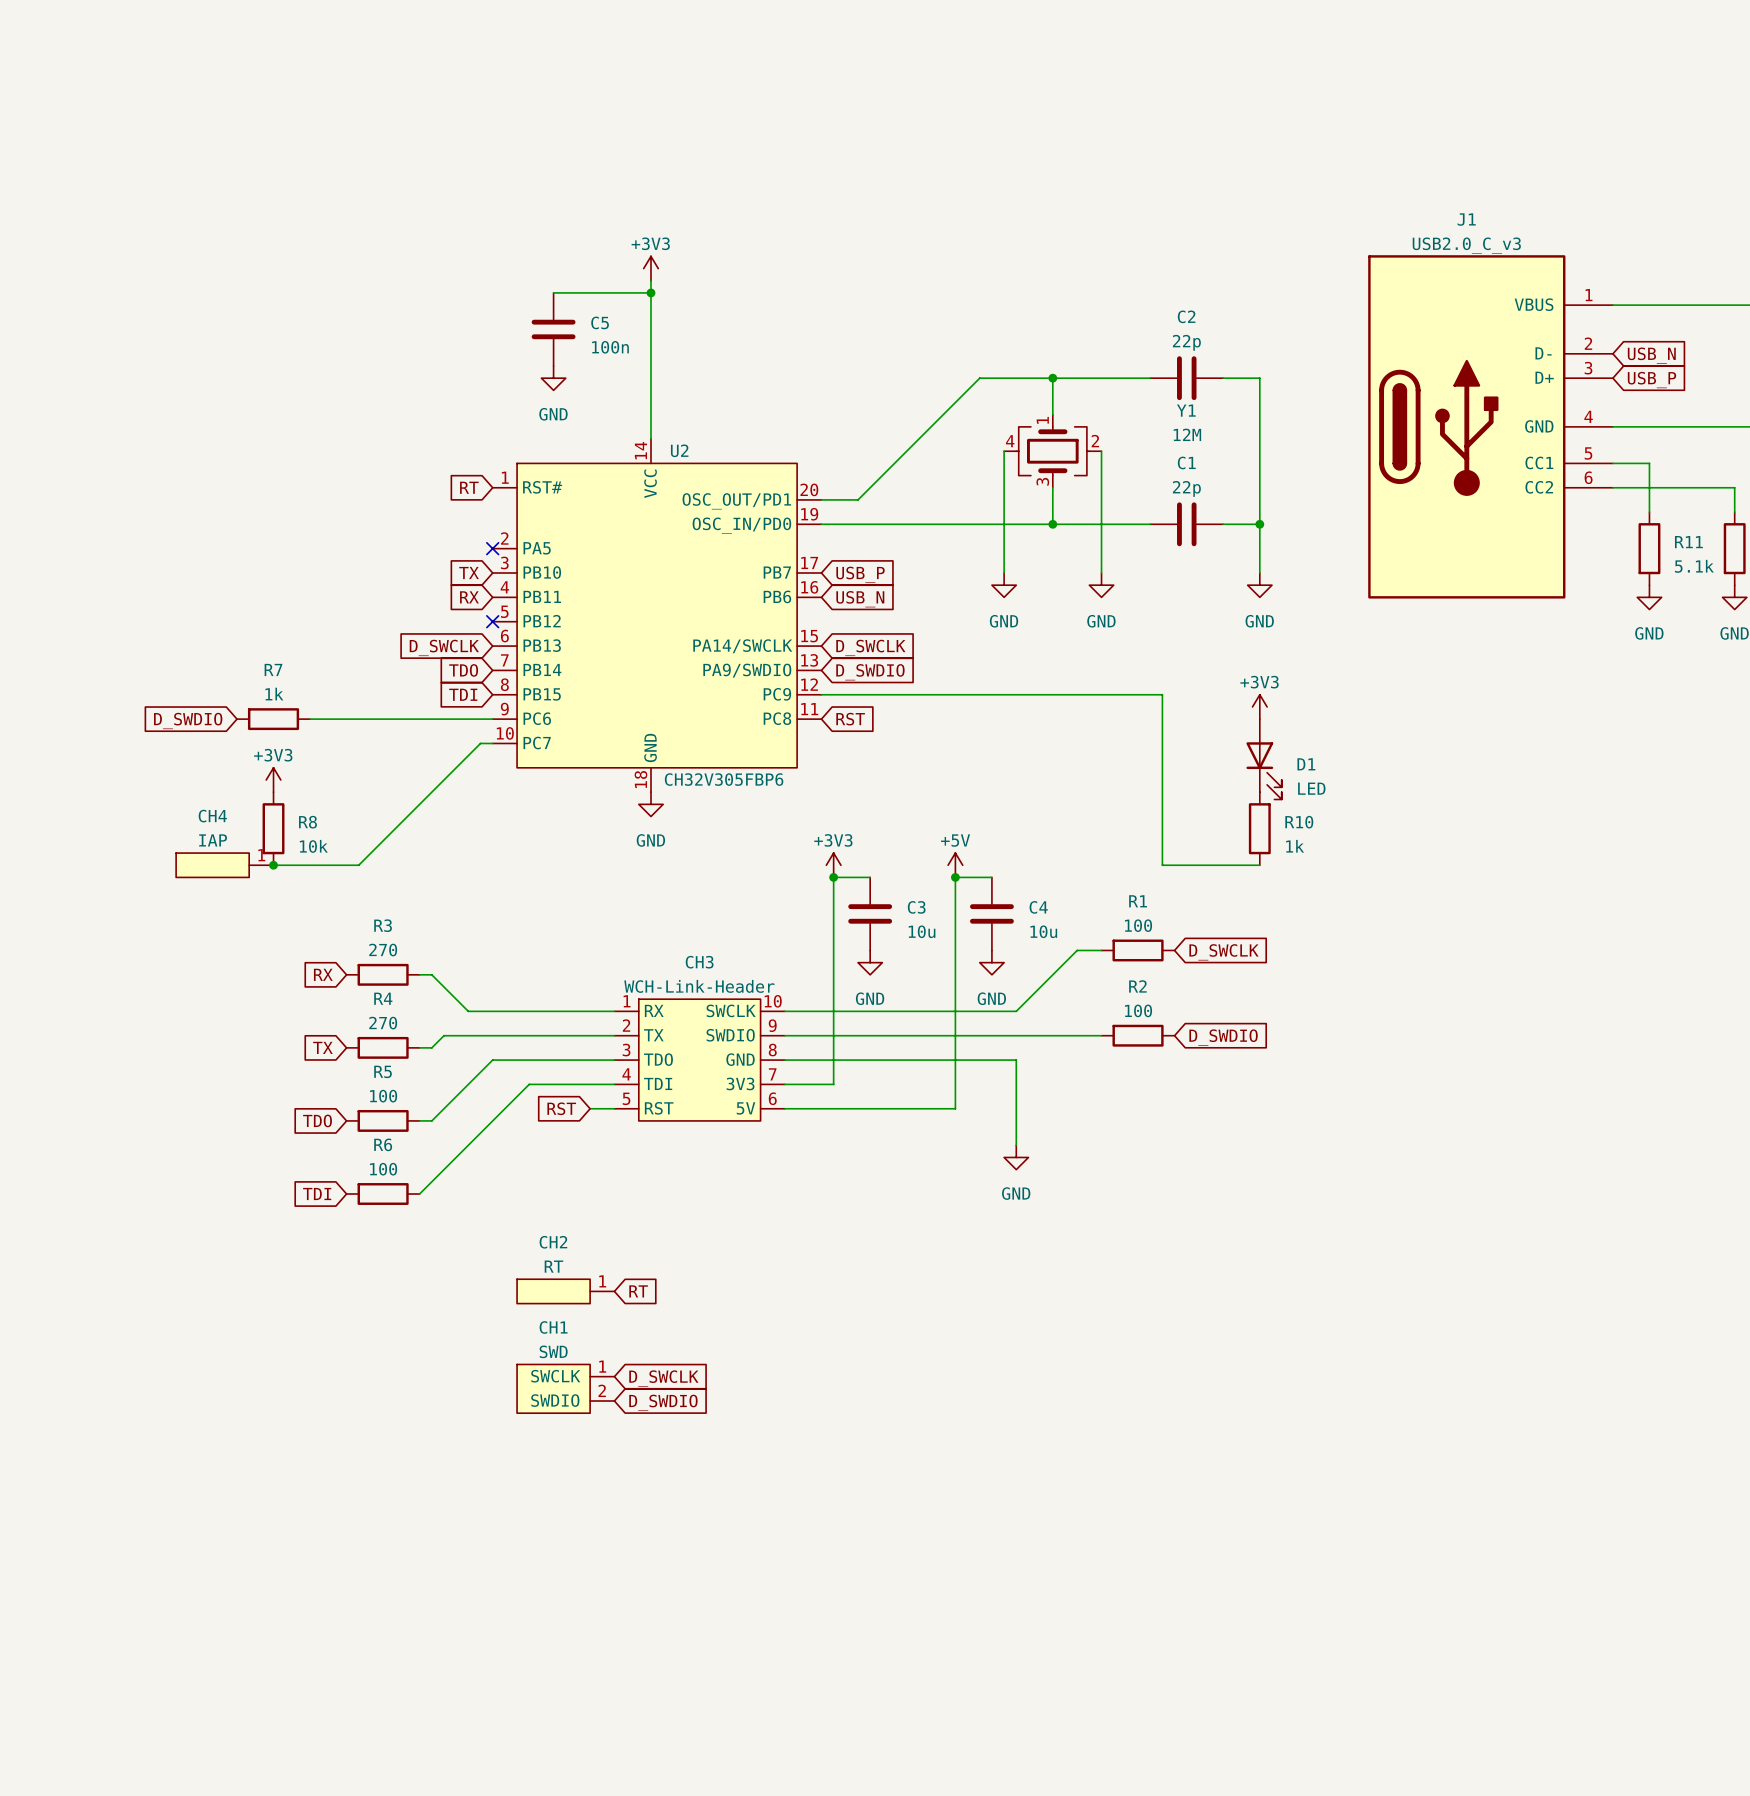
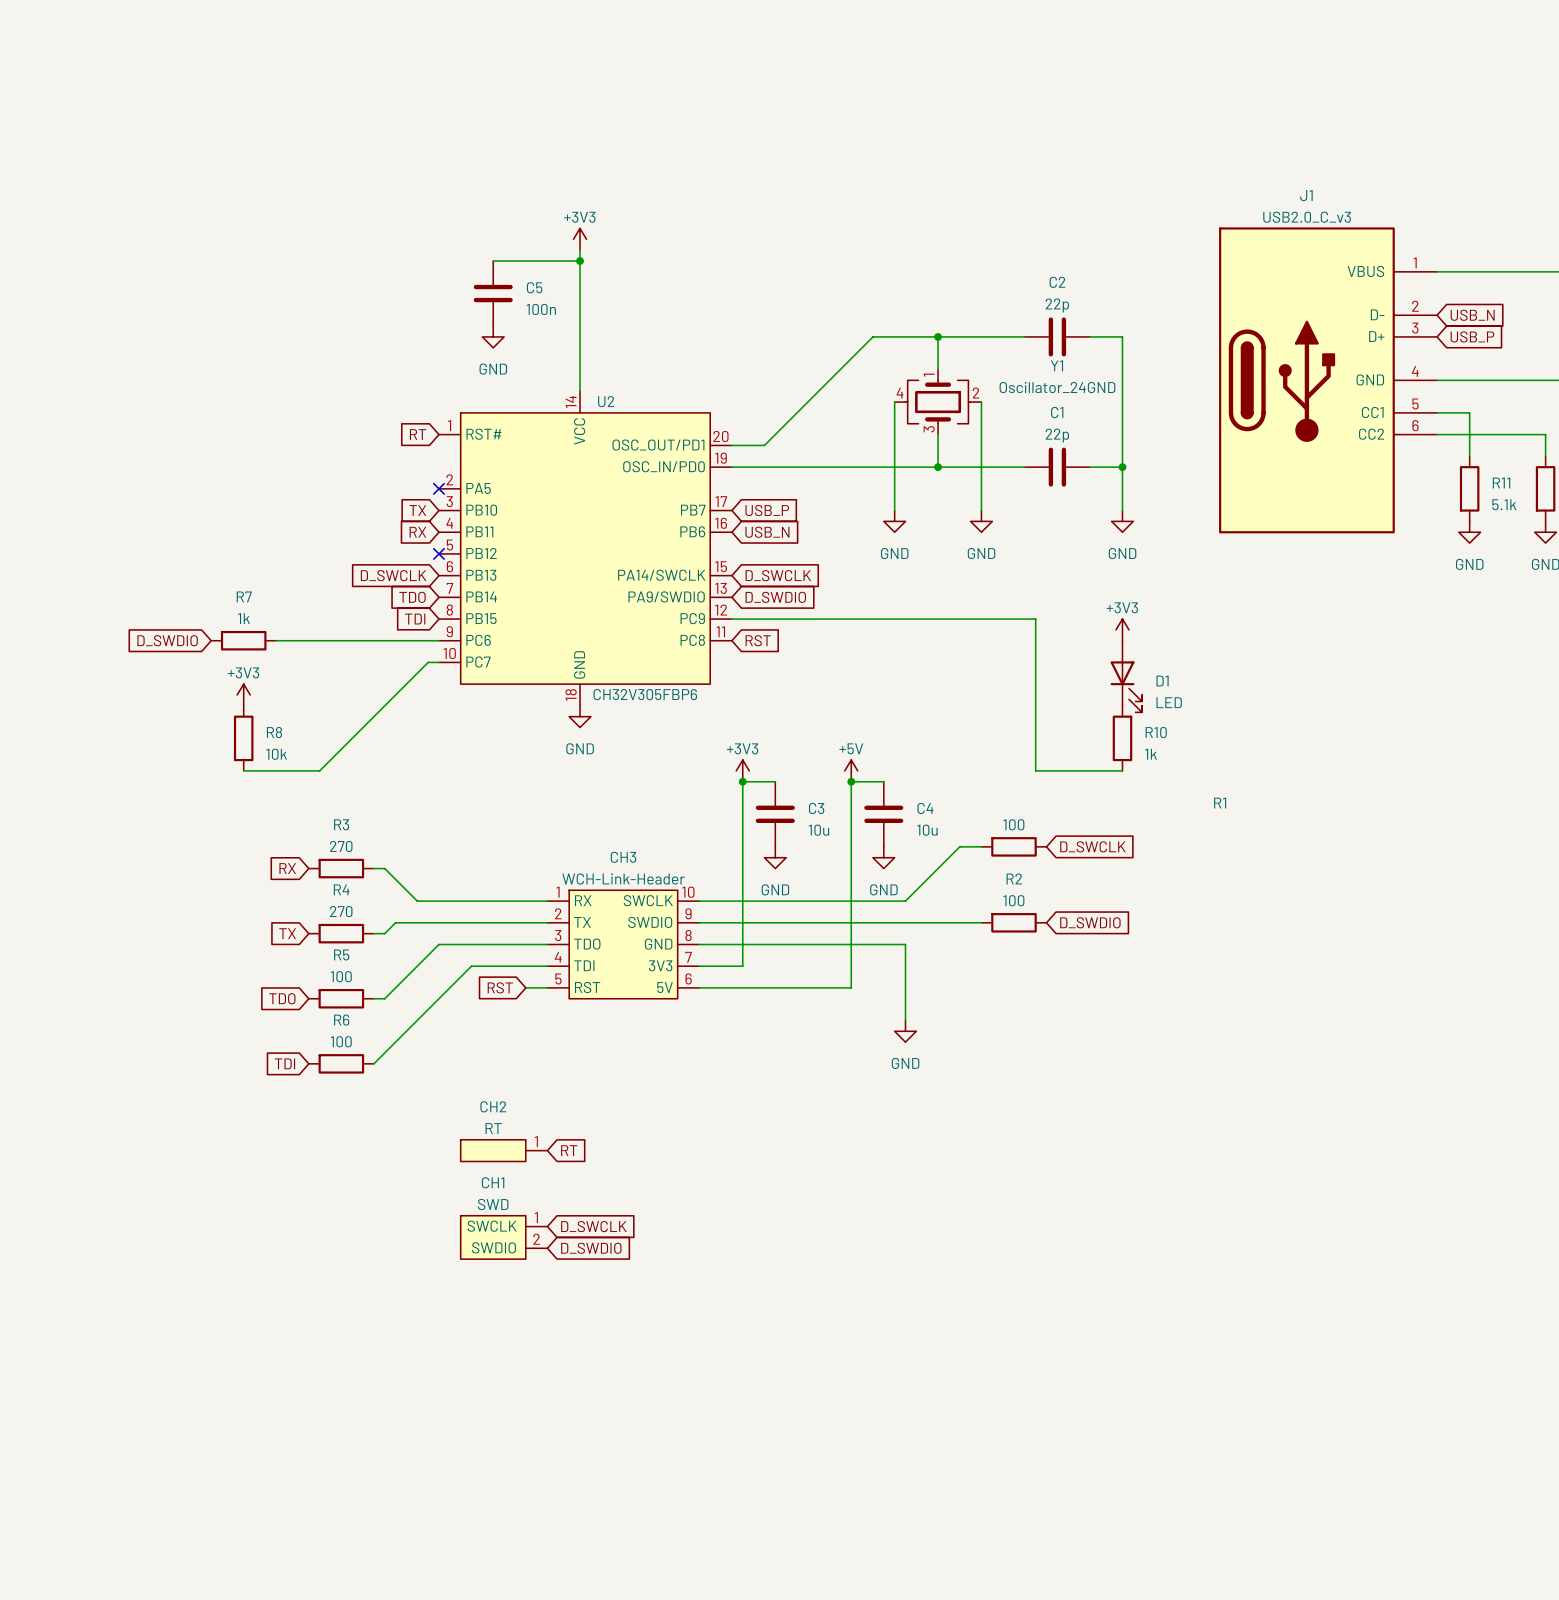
Y1 value: 12M (1187, 434) -> Oscillator_24GND (1057, 387)
CH4: IAP (224, 865) -> none
junction: (273, 865) -> none
R1 name position: R1 (1138, 901) -> R1 (1220, 803)

